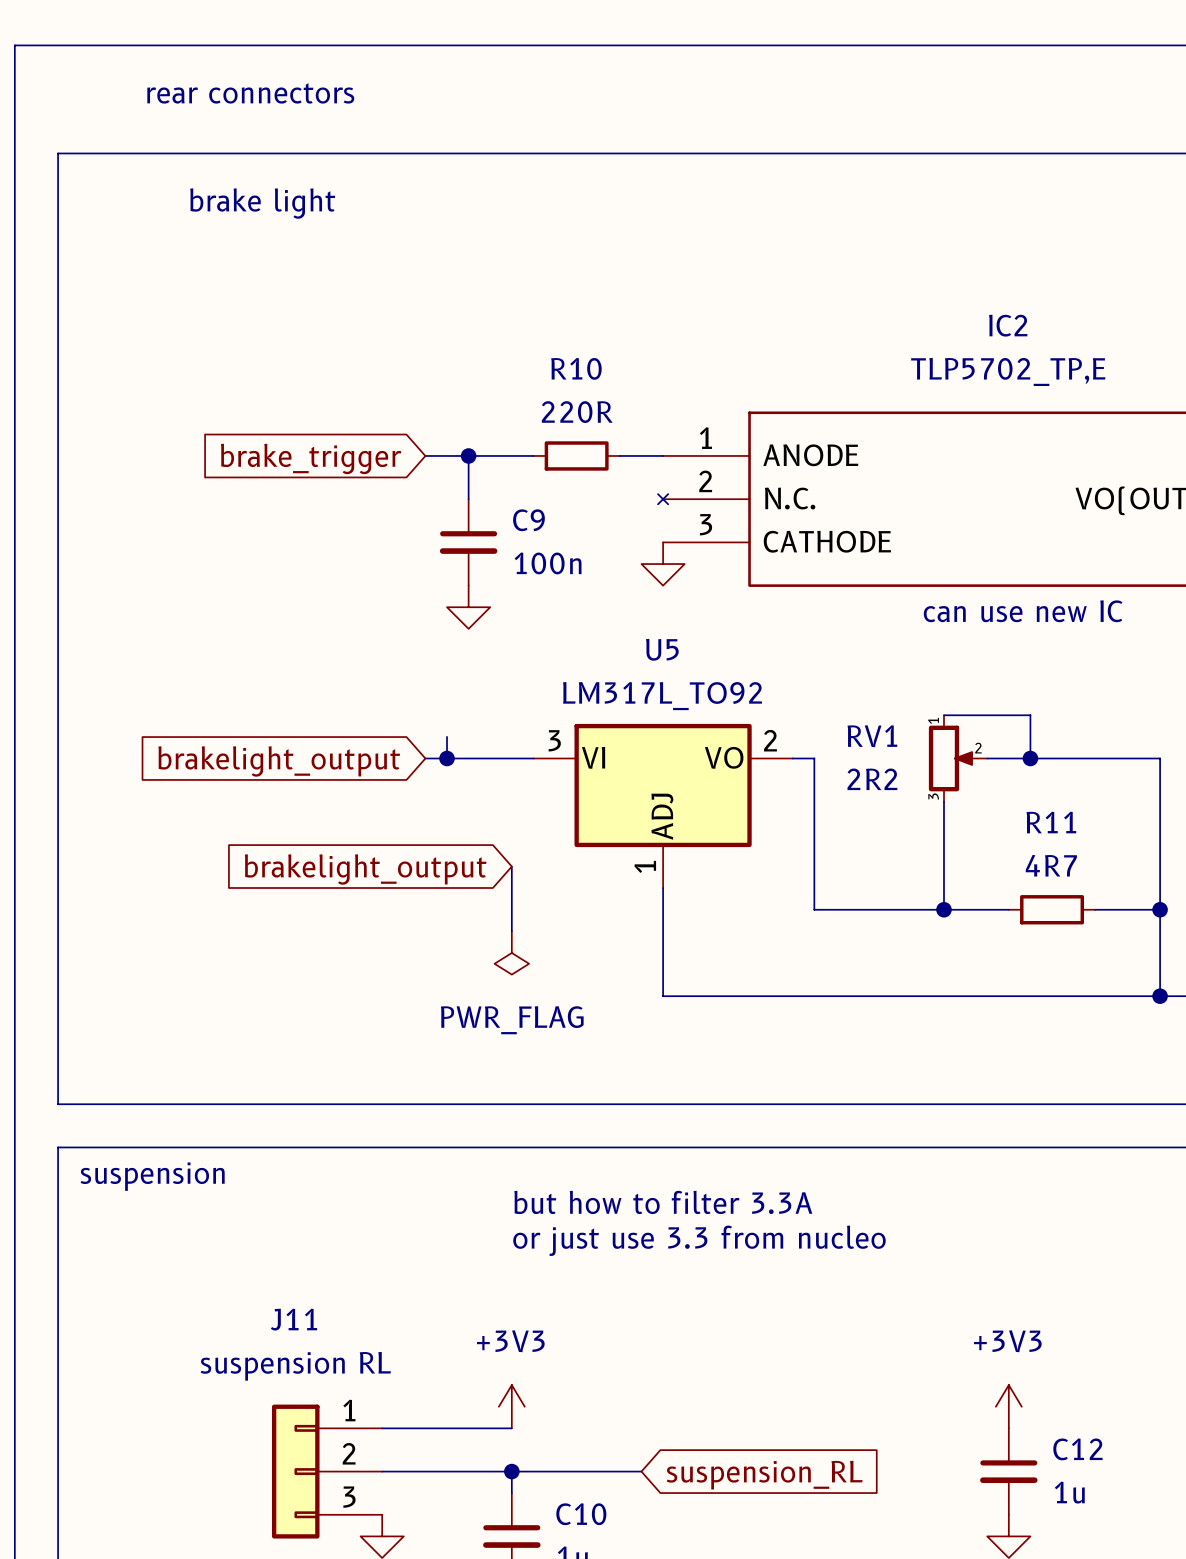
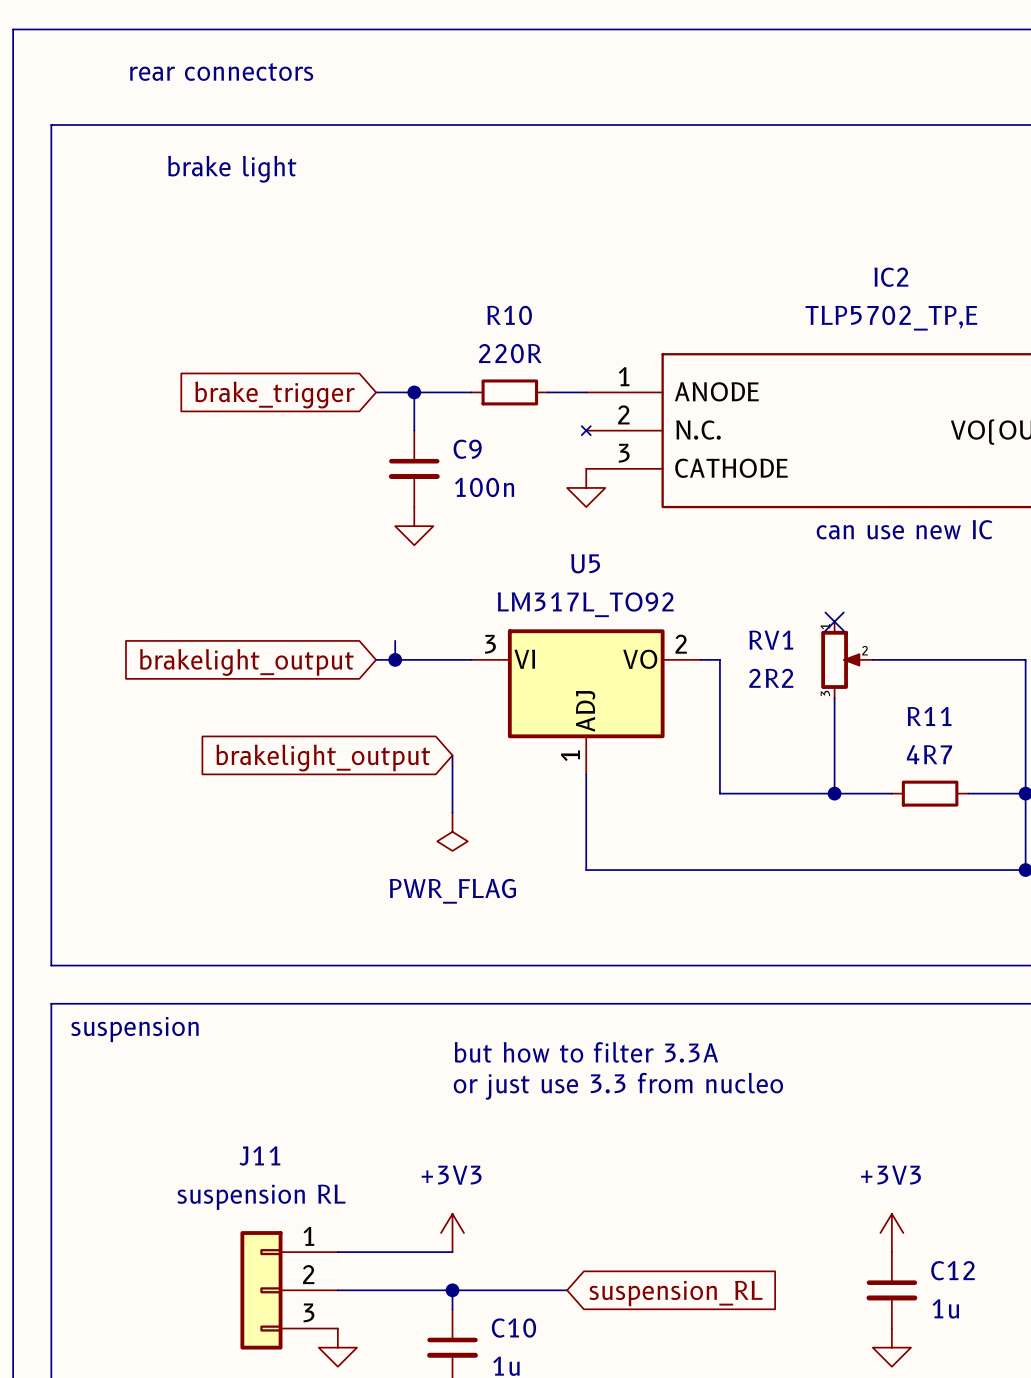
wire: (944, 715) (1030, 715) (1030, 758) -> none
no-connect mark: none -> (834, 621)
junction: (1030, 758) -> none

